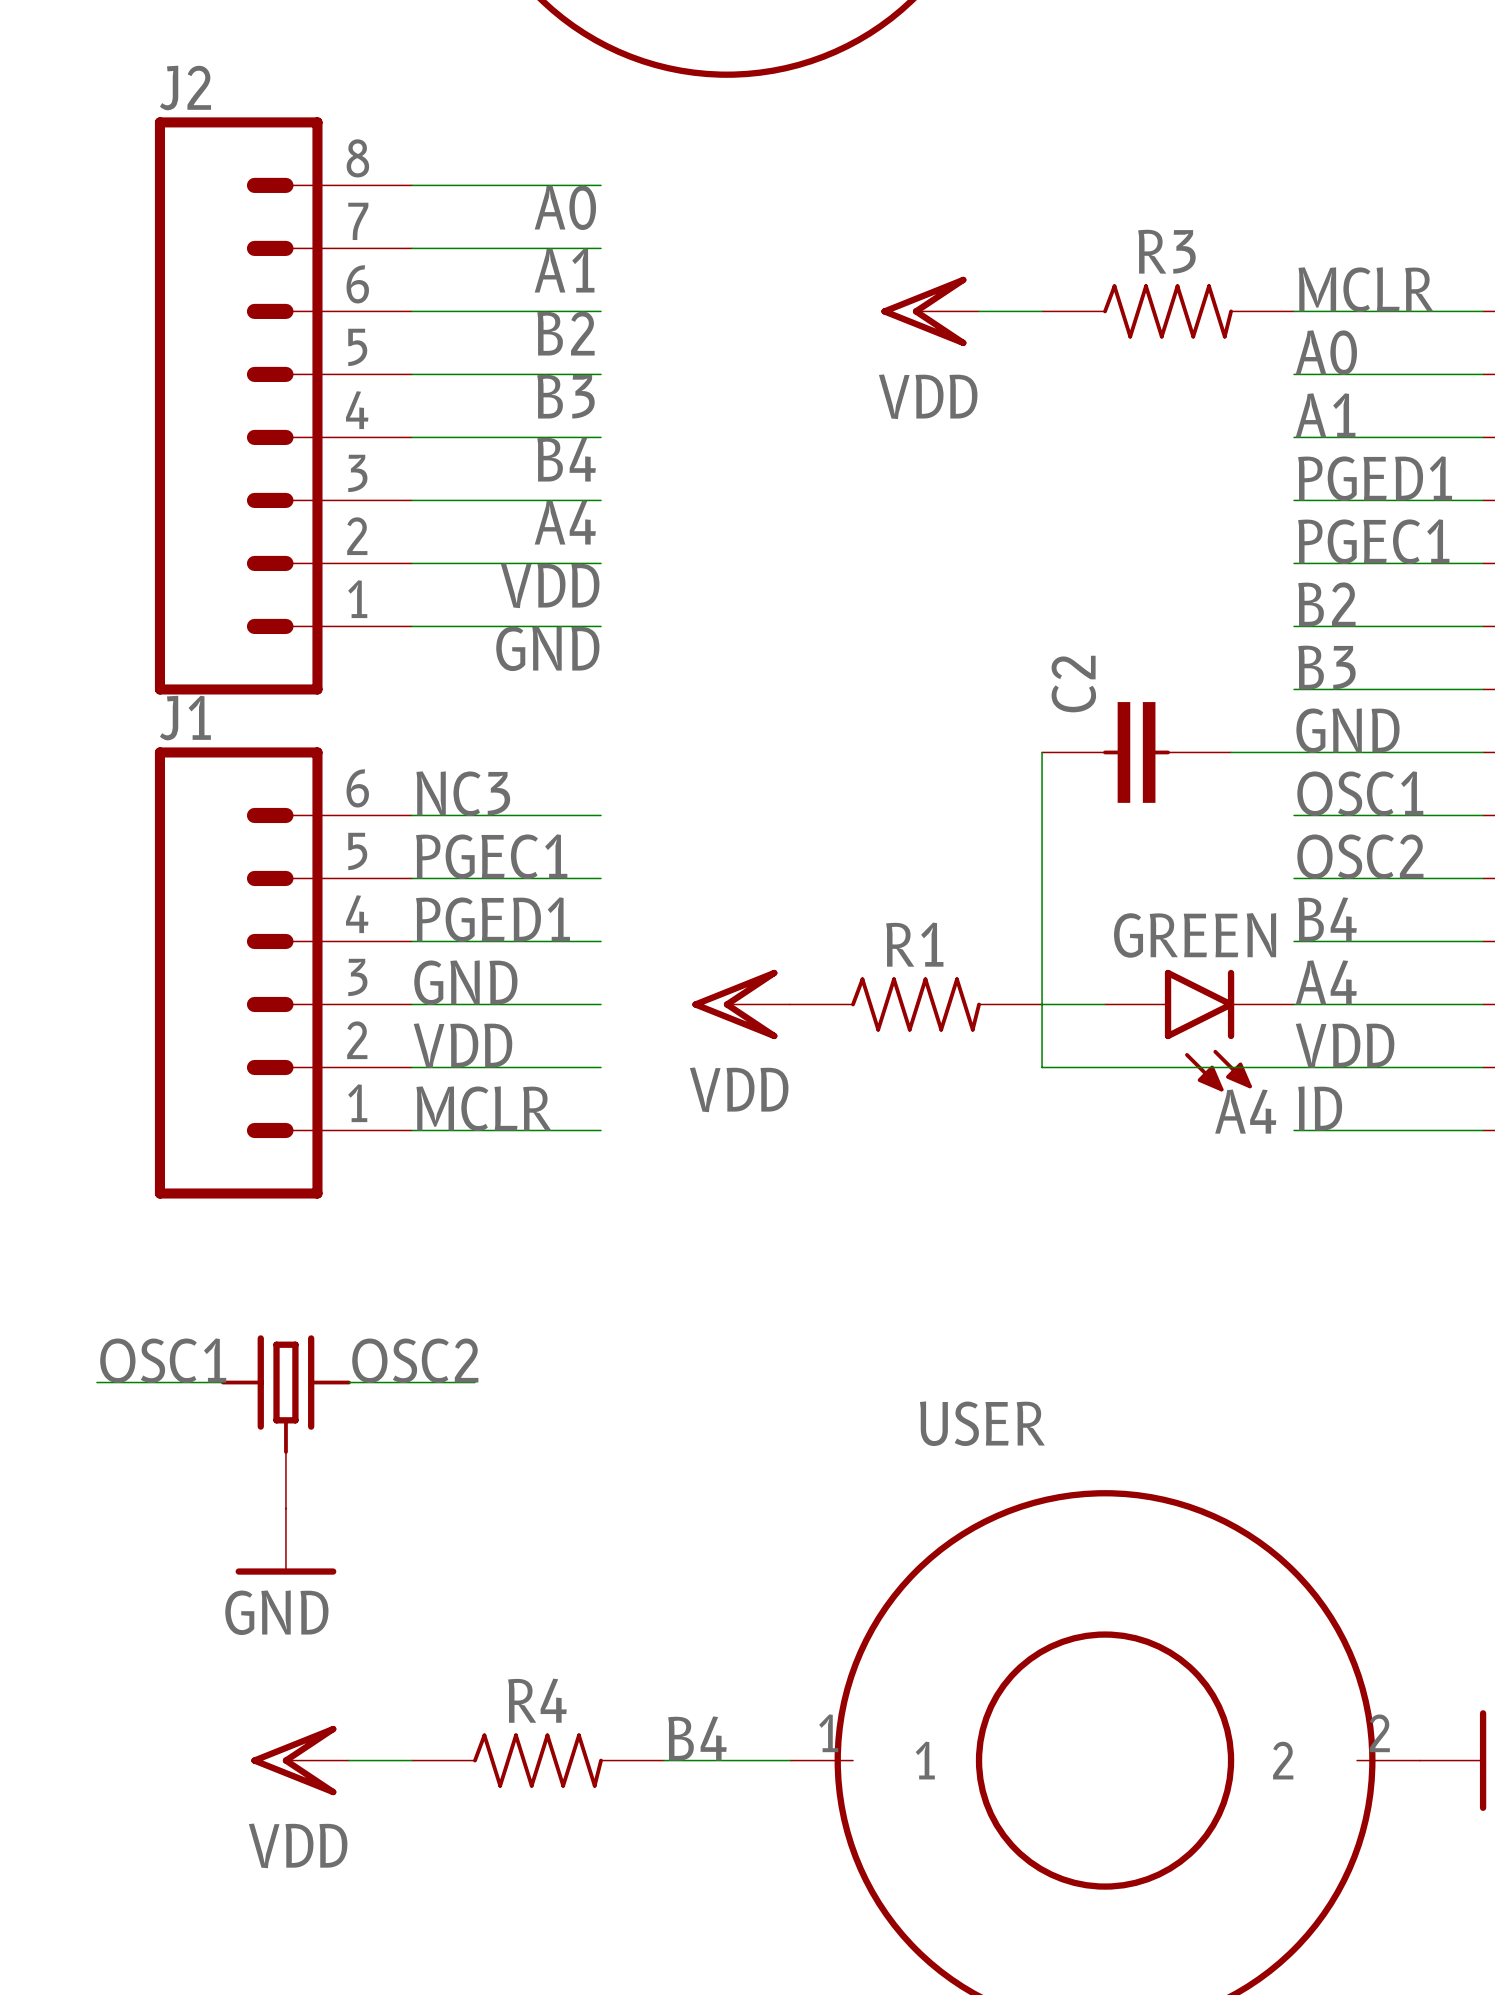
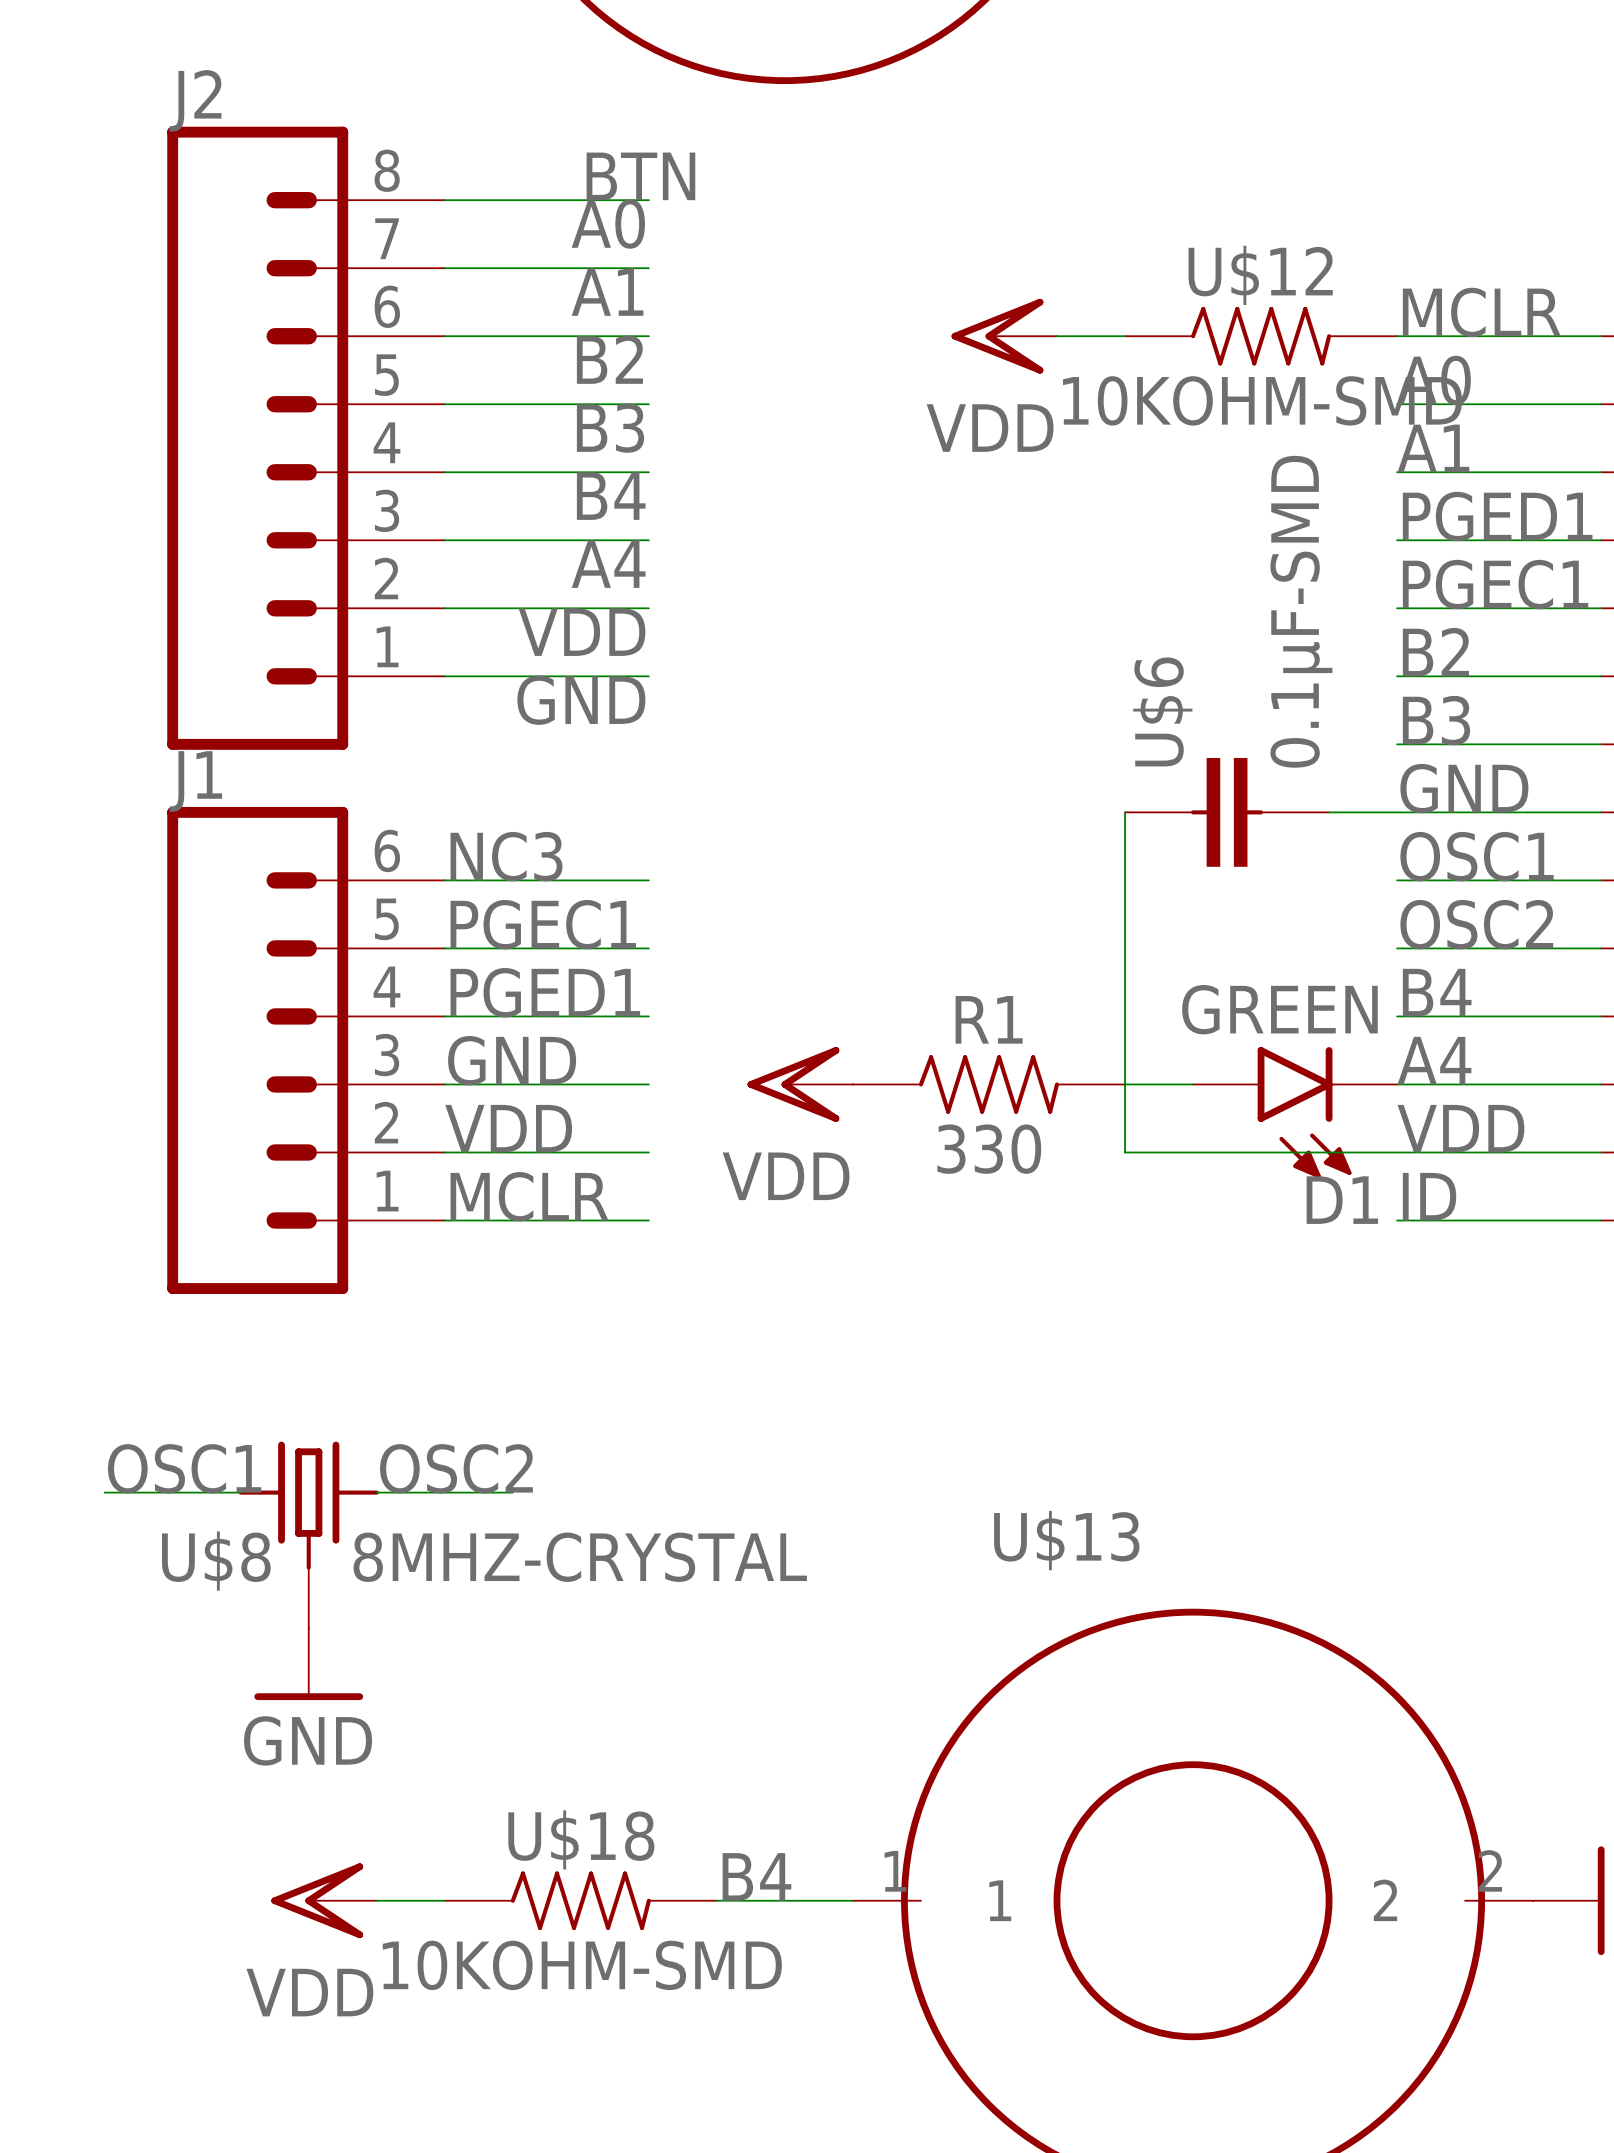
part value: none -> BTN (640, 176)
R3 name: R3 (1166, 251) -> U$12 (1260, 275)
R3 value: none -> 10KOHM-SMD (1262, 400)
C2 value: none -> 0.1µF-SMD (1301, 611)
C2 name: C2 (1073, 684) -> U$6 (1162, 711)
R1 value: none -> 330 (989, 1149)
A4 name: A4 (1245, 1111) -> D1 (1342, 1200)
USER name: USER (982, 1423) -> U$13 (1066, 1540)
U$8 name: none -> U$8 (216, 1561)
U$8 value: none -> 8MHZ-CRYSTAL (580, 1557)
R4 name: R4 (537, 1700) -> U$18 (581, 1839)
R4 value: none -> 10KOHM-SMD (582, 1965)

